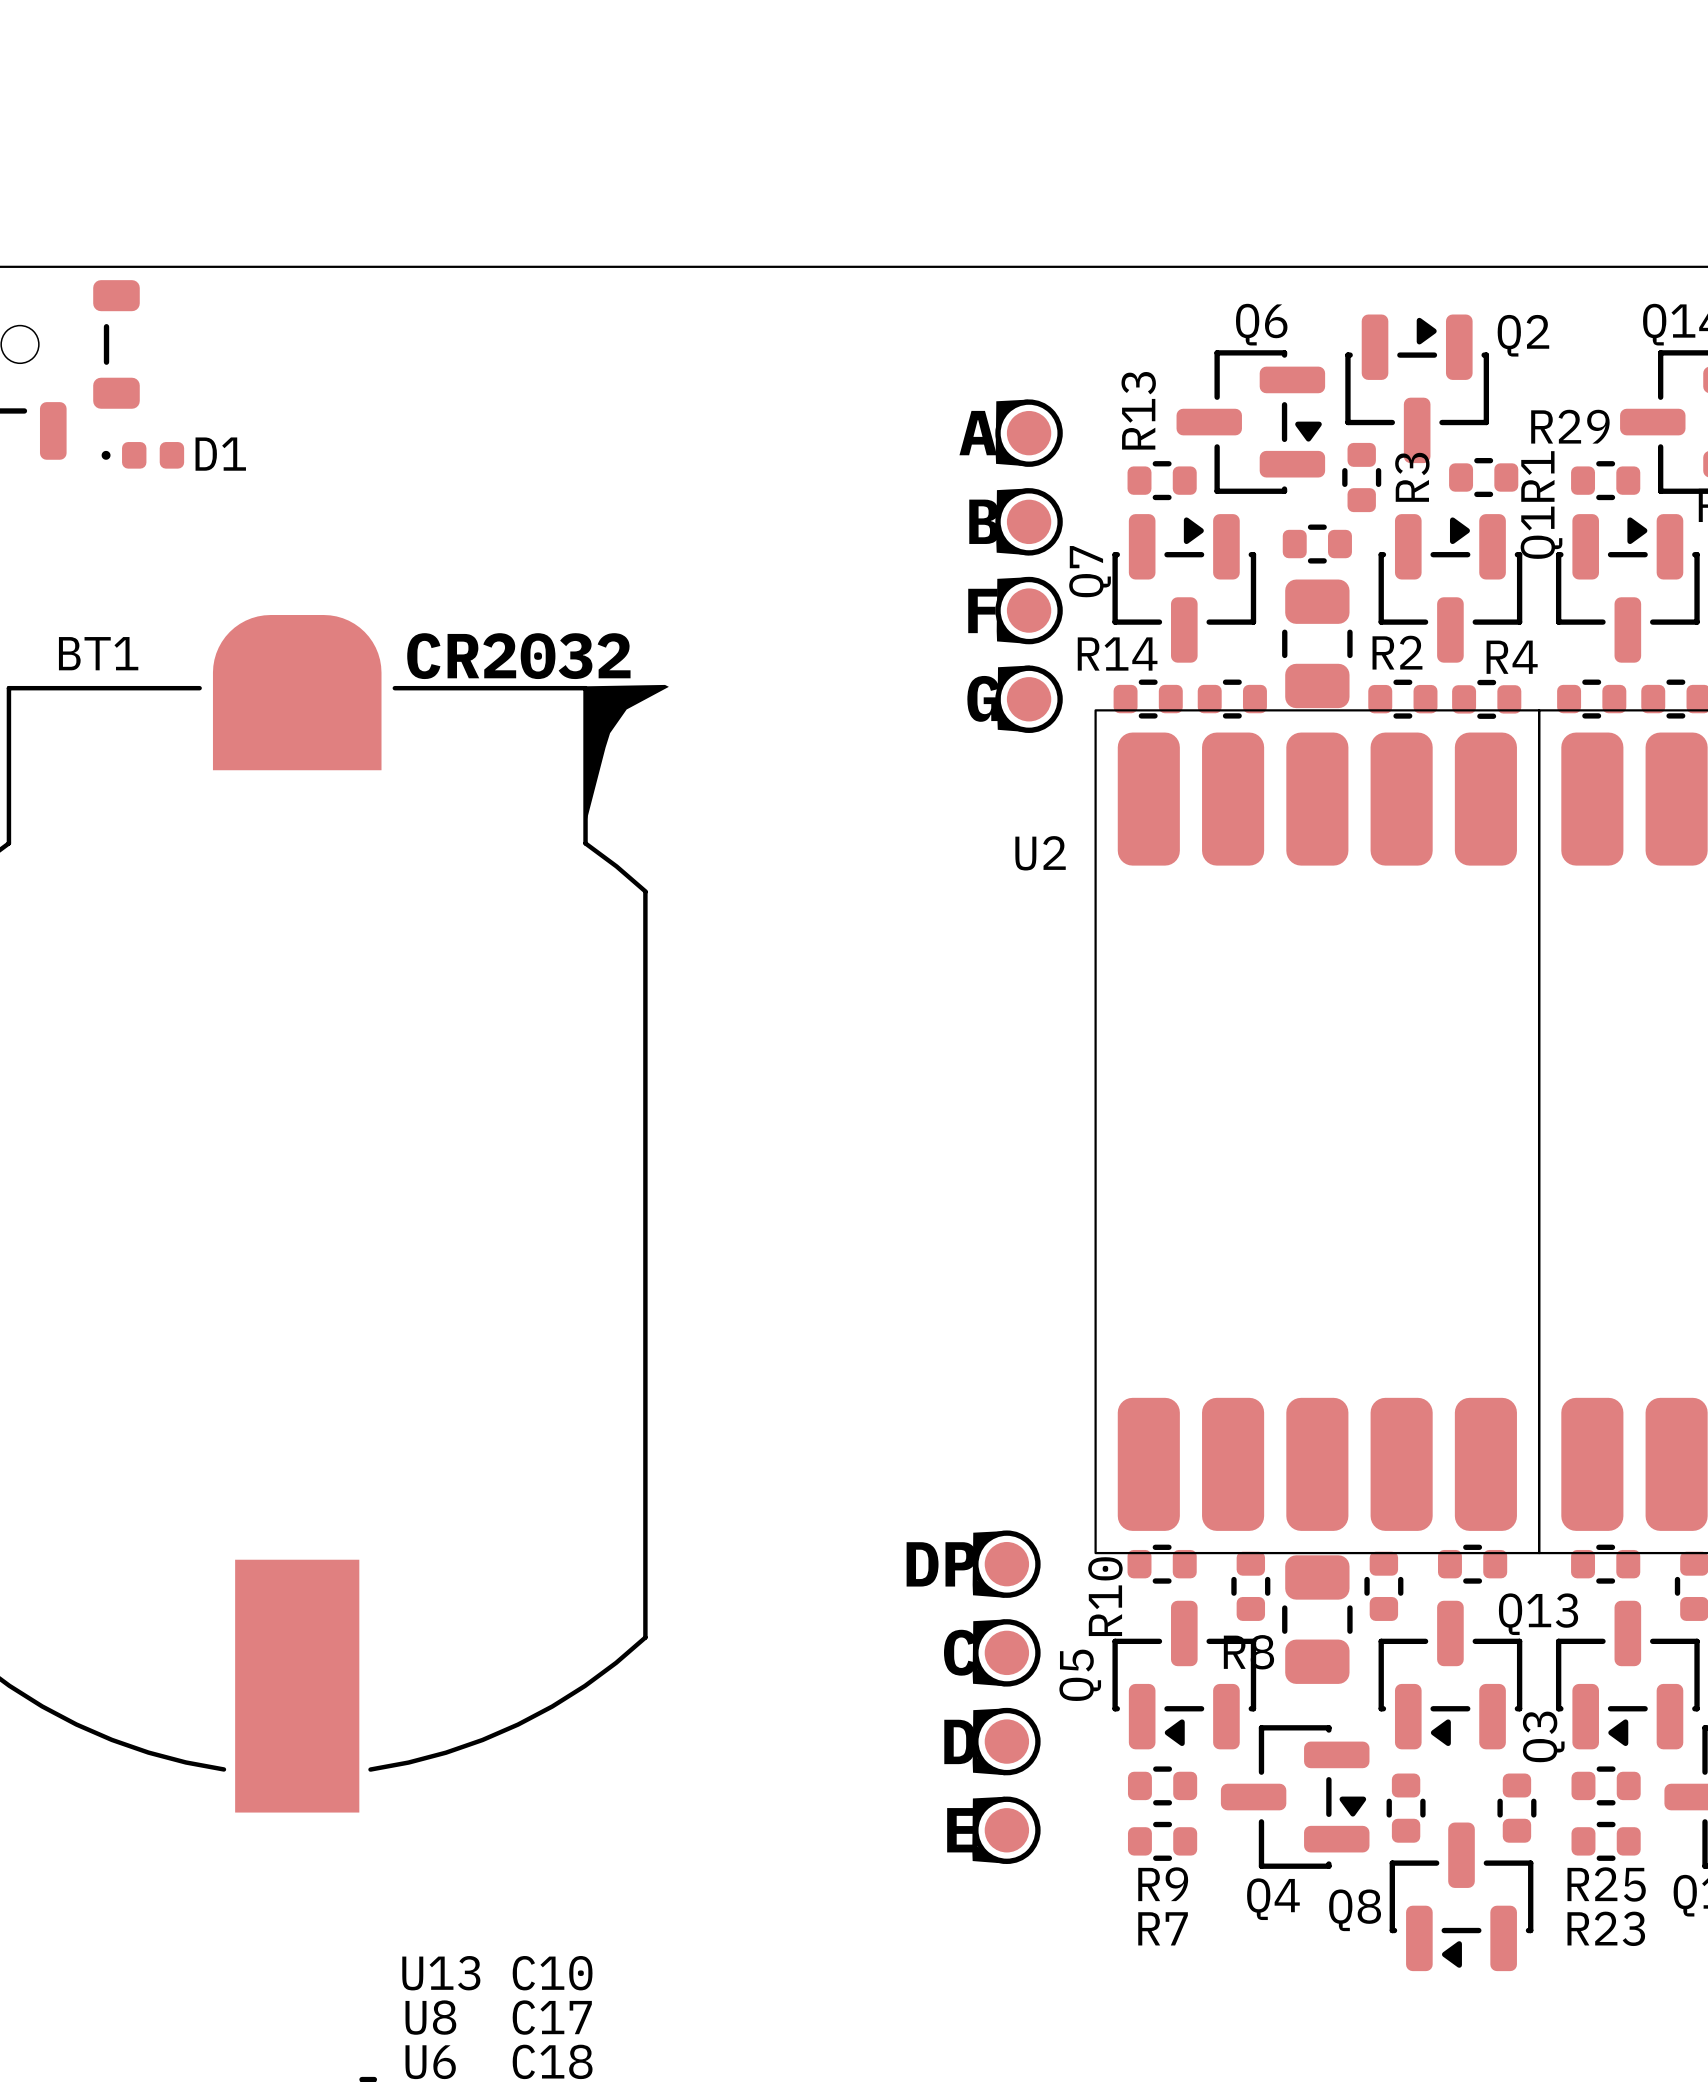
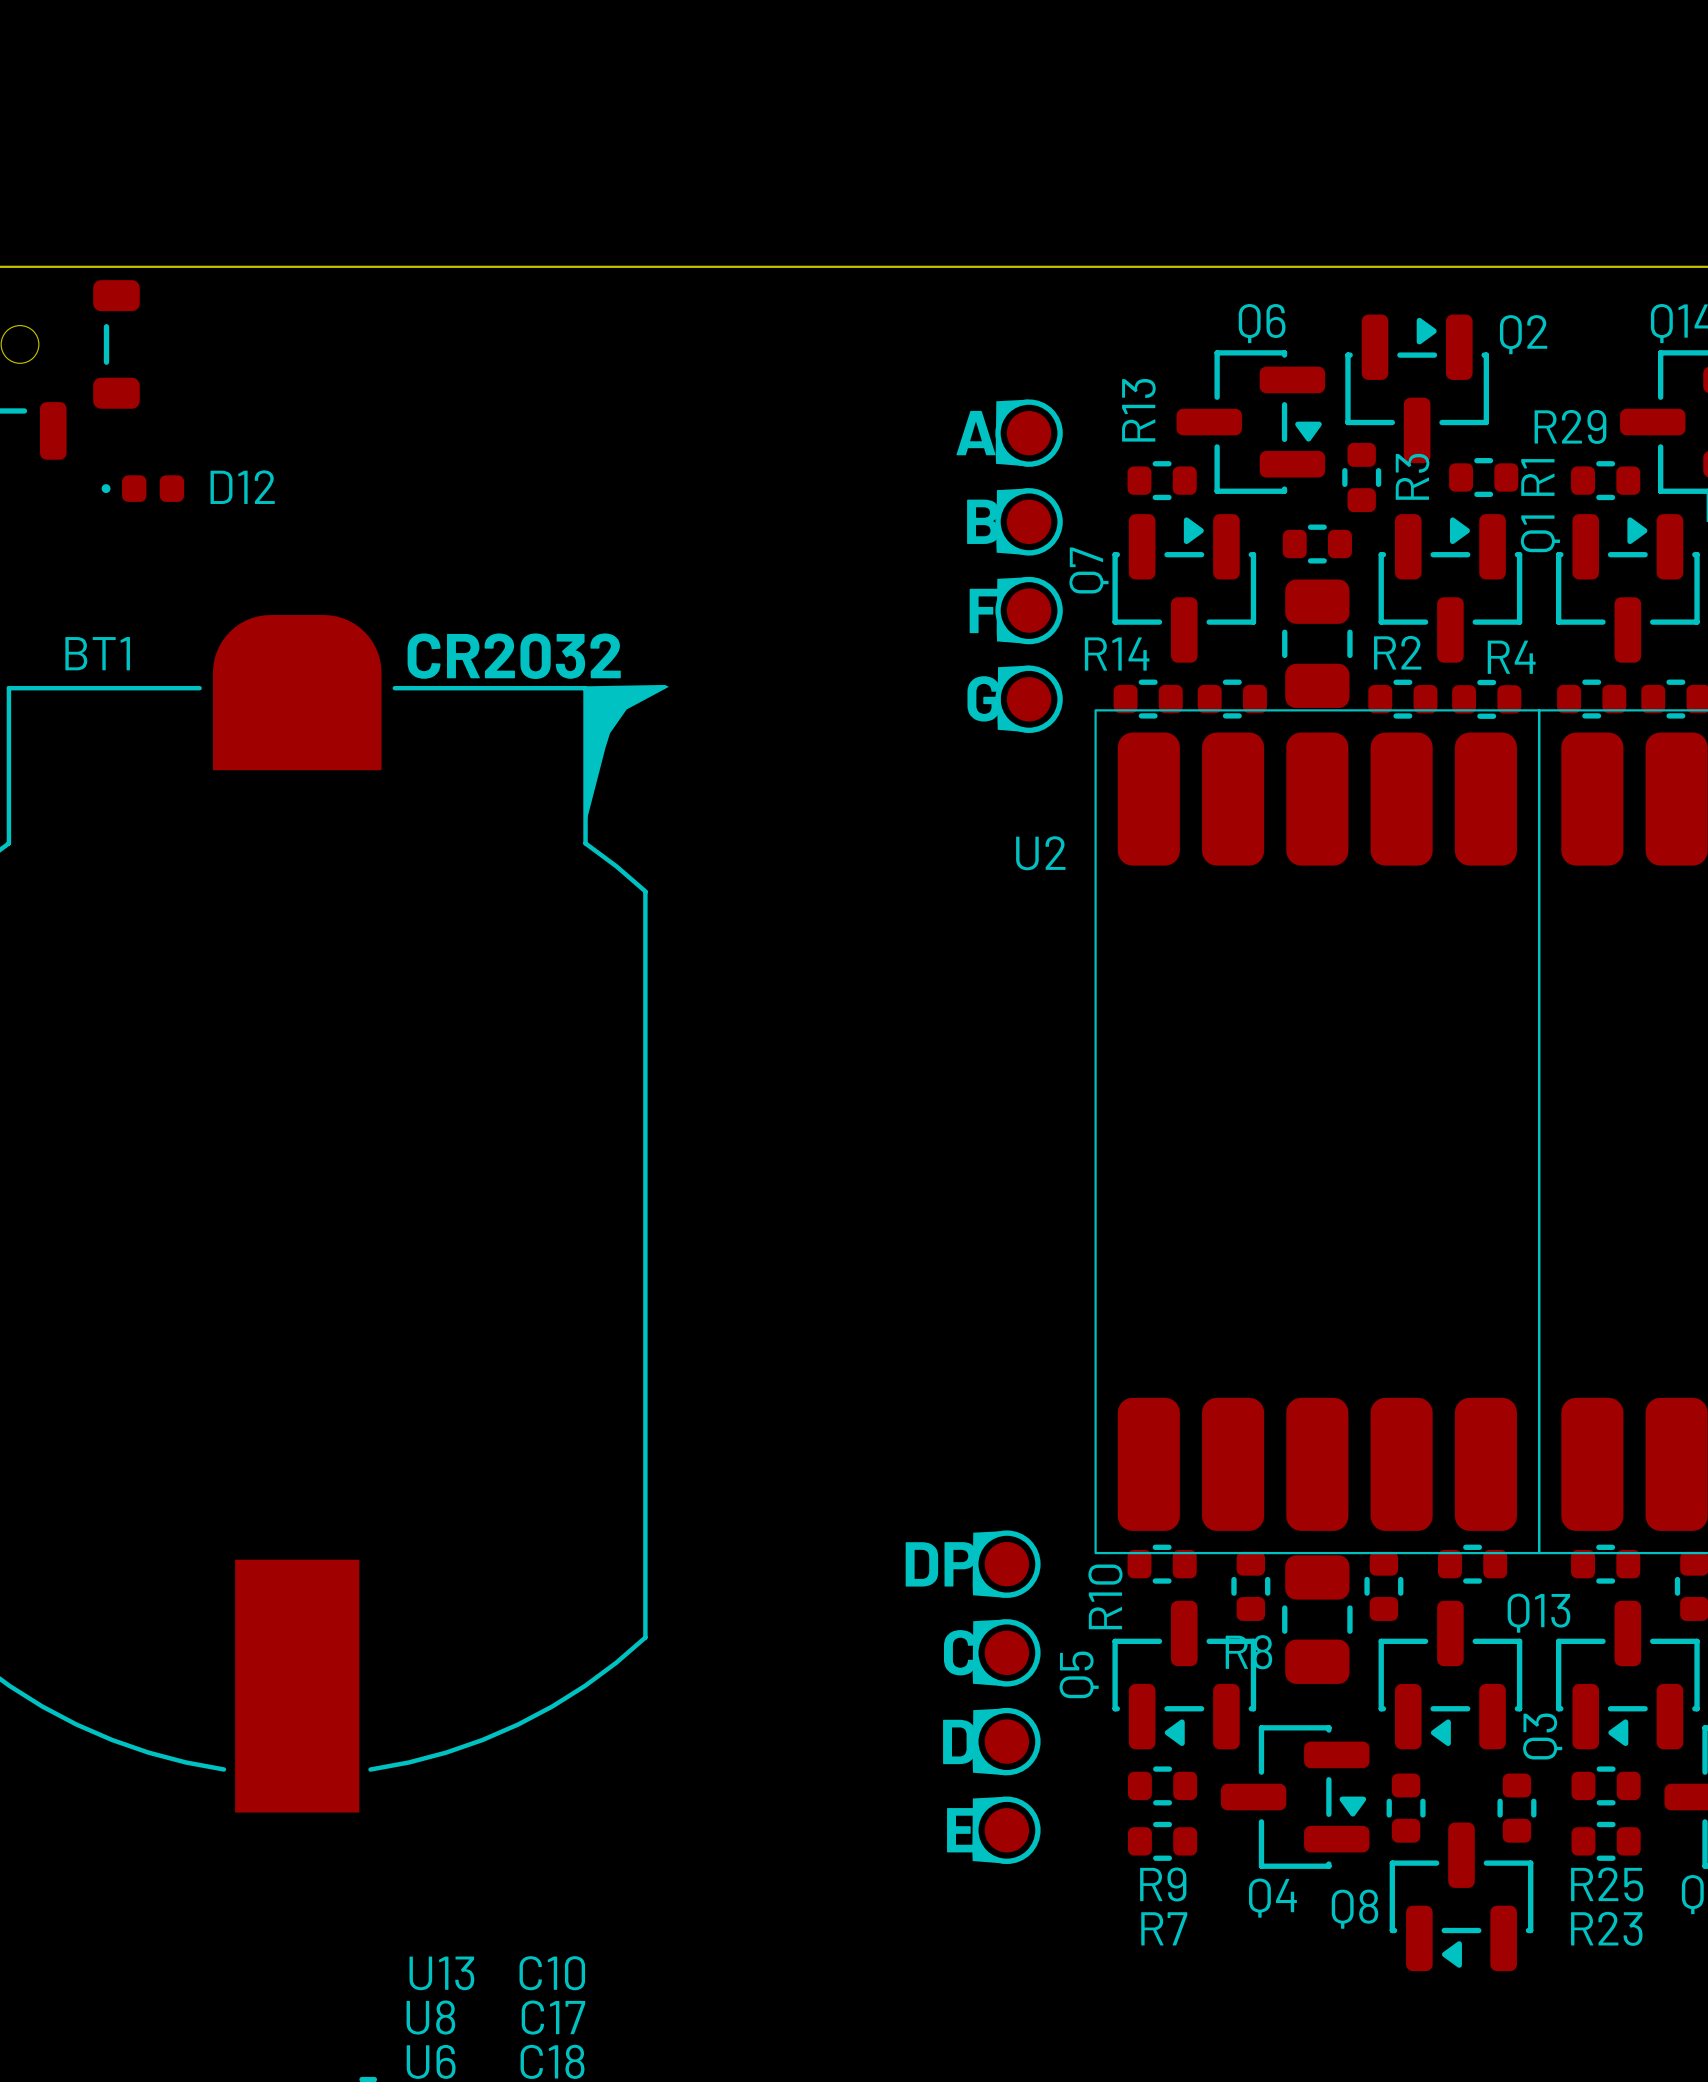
D1 name: D1 (220, 454) -> D12 (242, 487)
D1 position: (142, 455) -> (142, 488)

